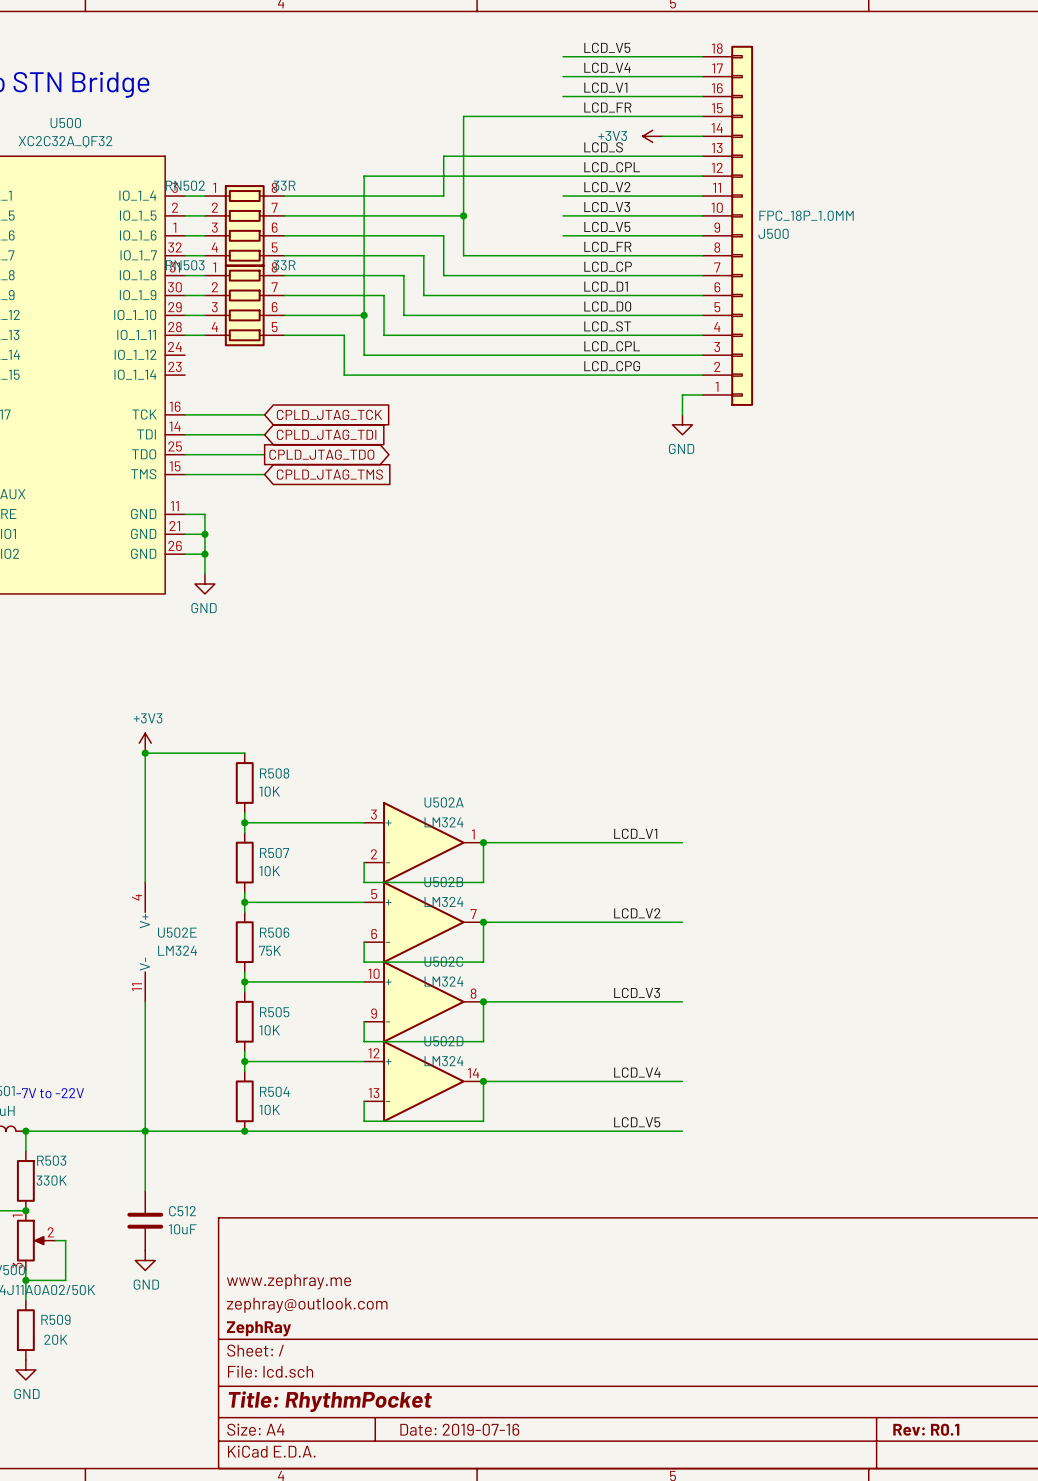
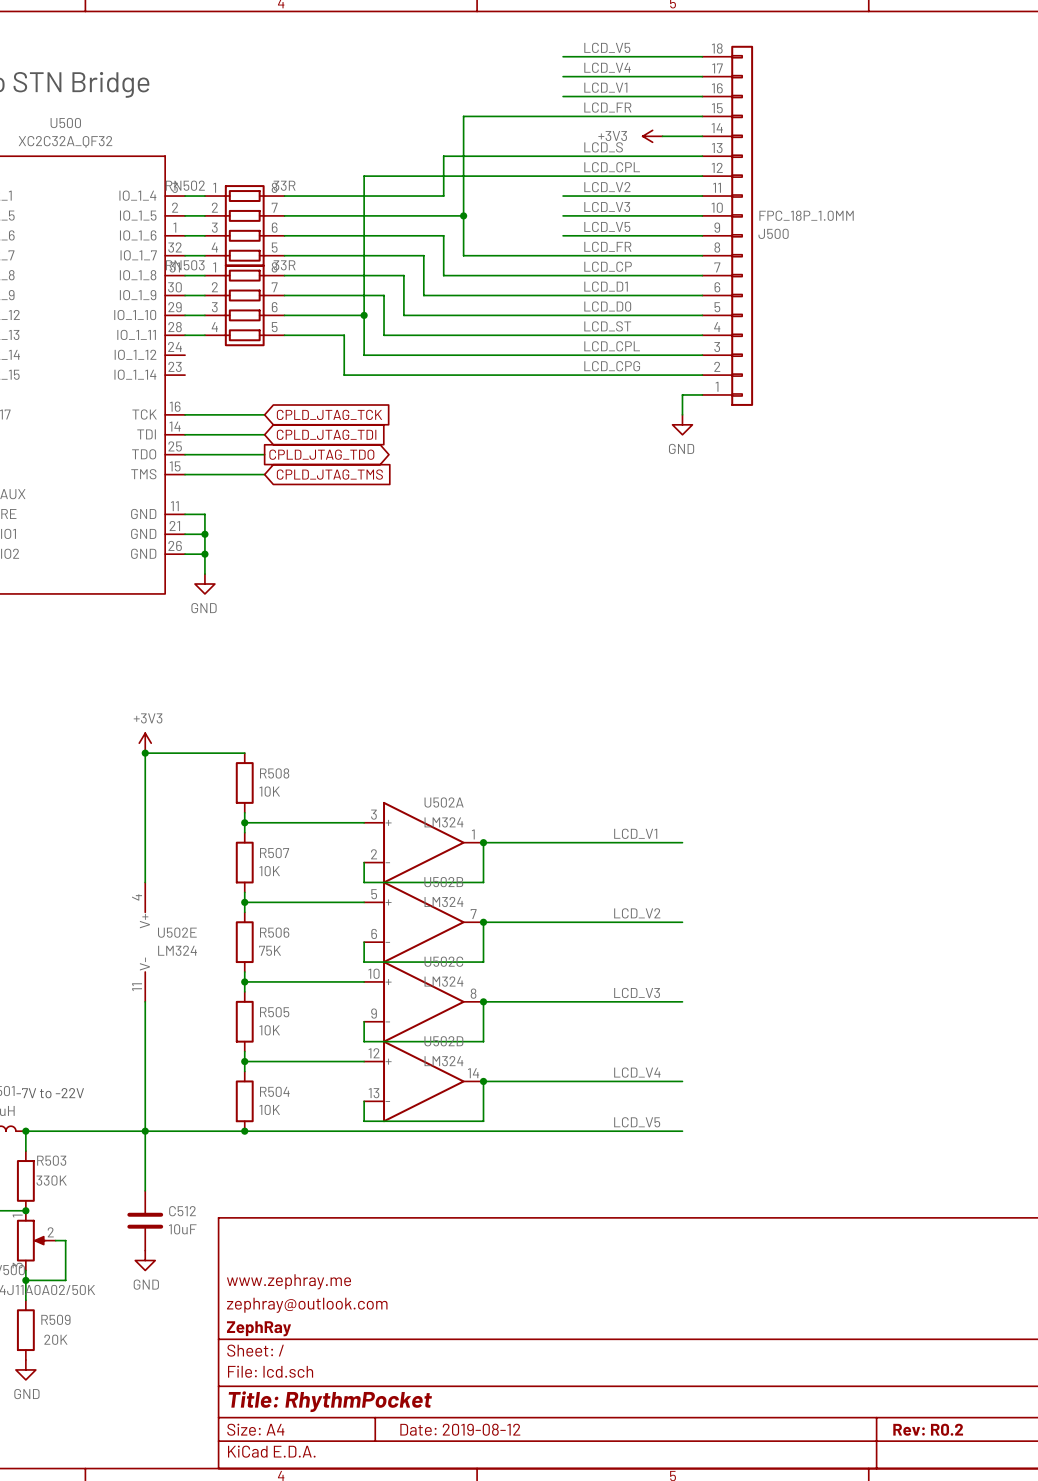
title block: Date: 2019-07-16 (459, 1429) -> Date: 2019-08-12 (460, 1429)
title block: Rev: R0.1 (926, 1429) -> Rev: R0.2 (928, 1429)

